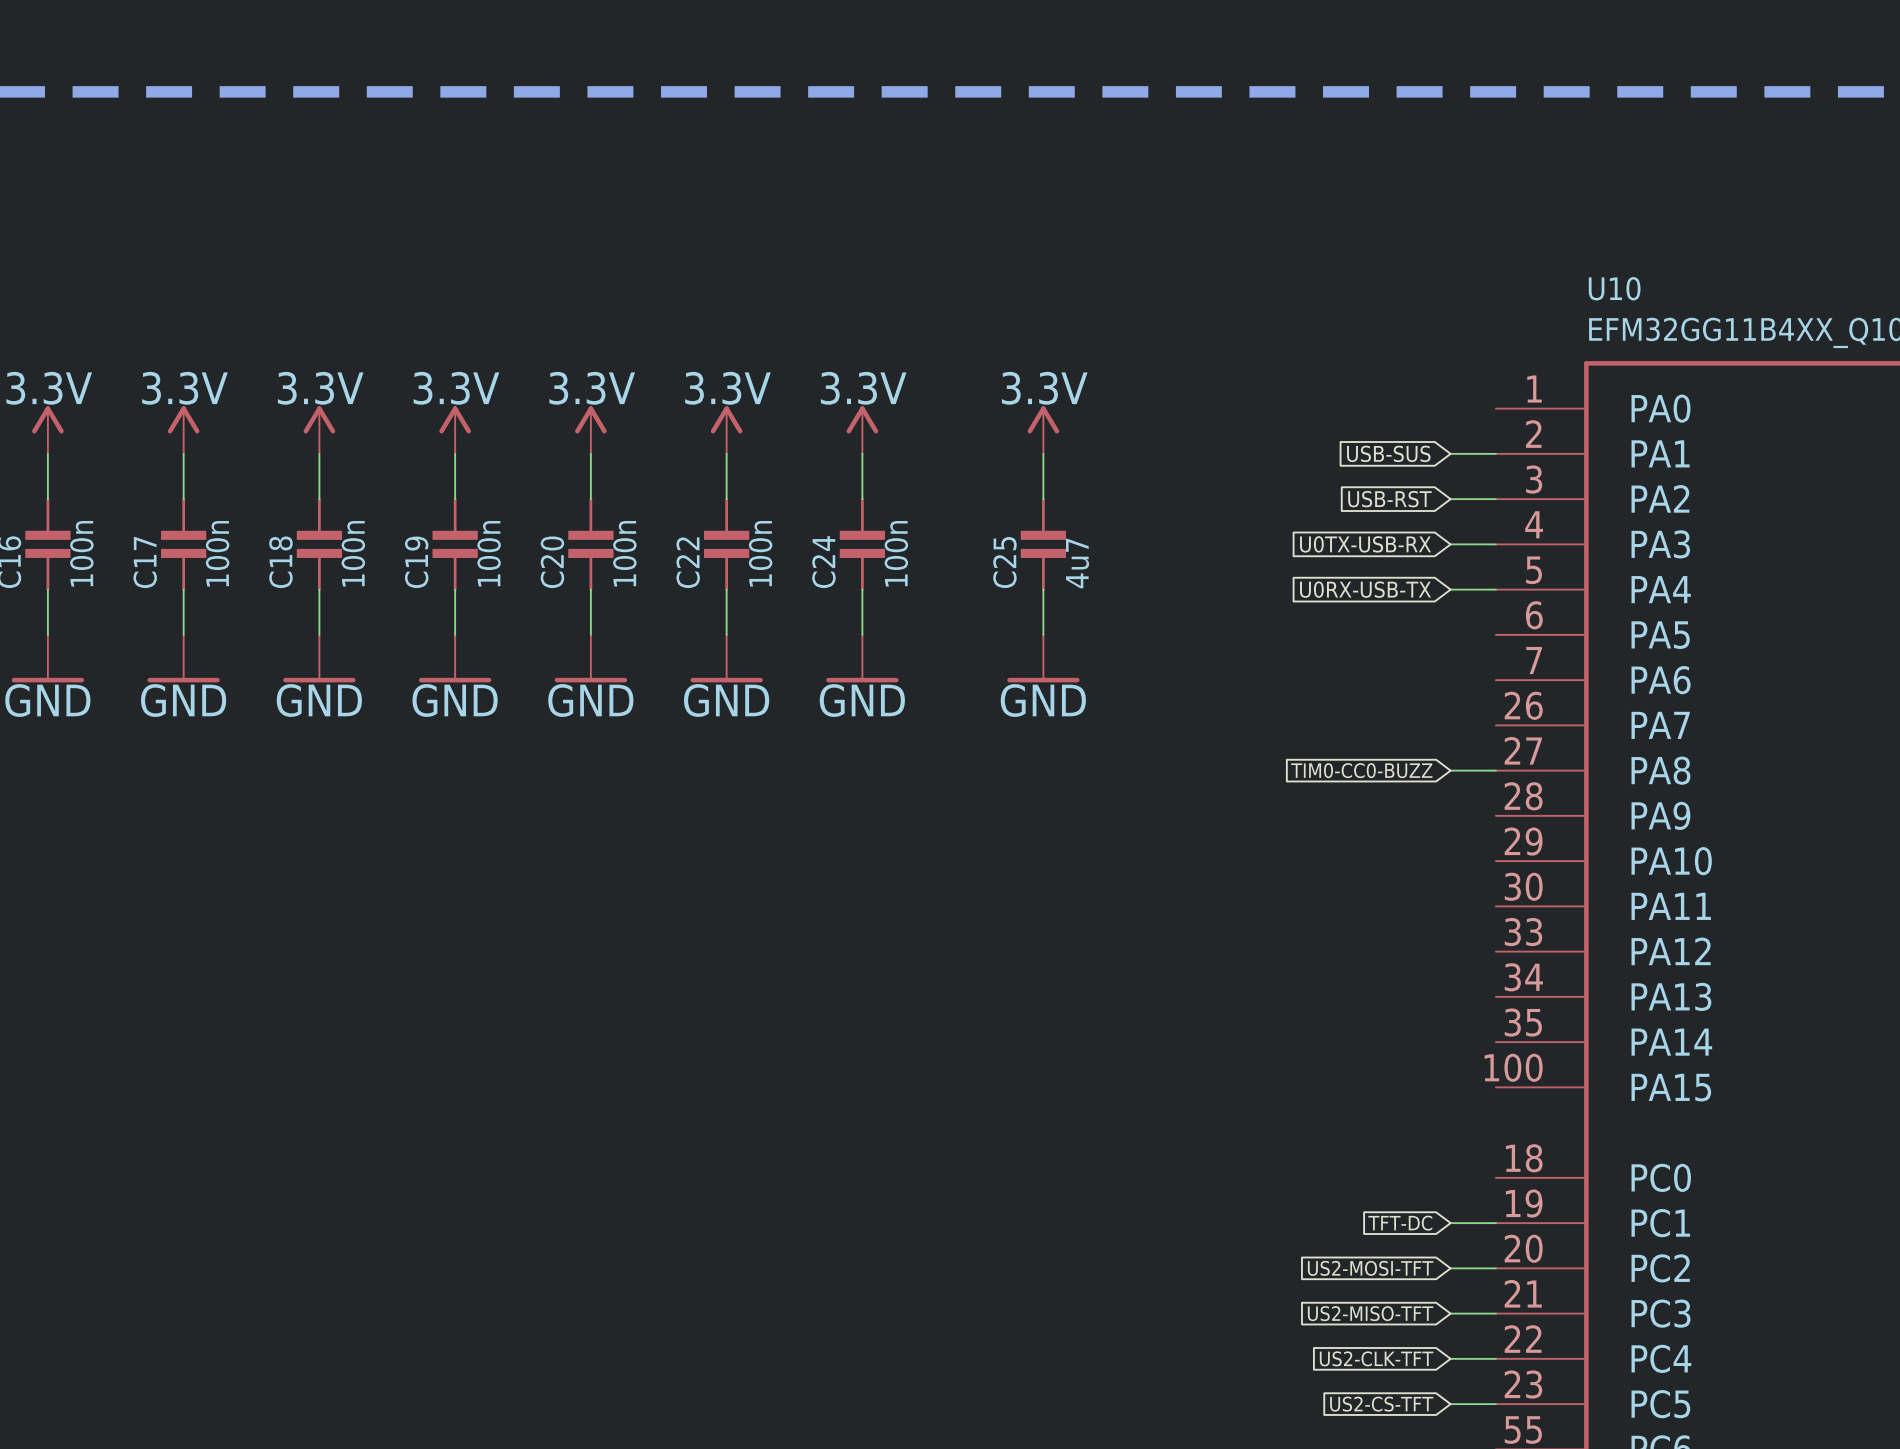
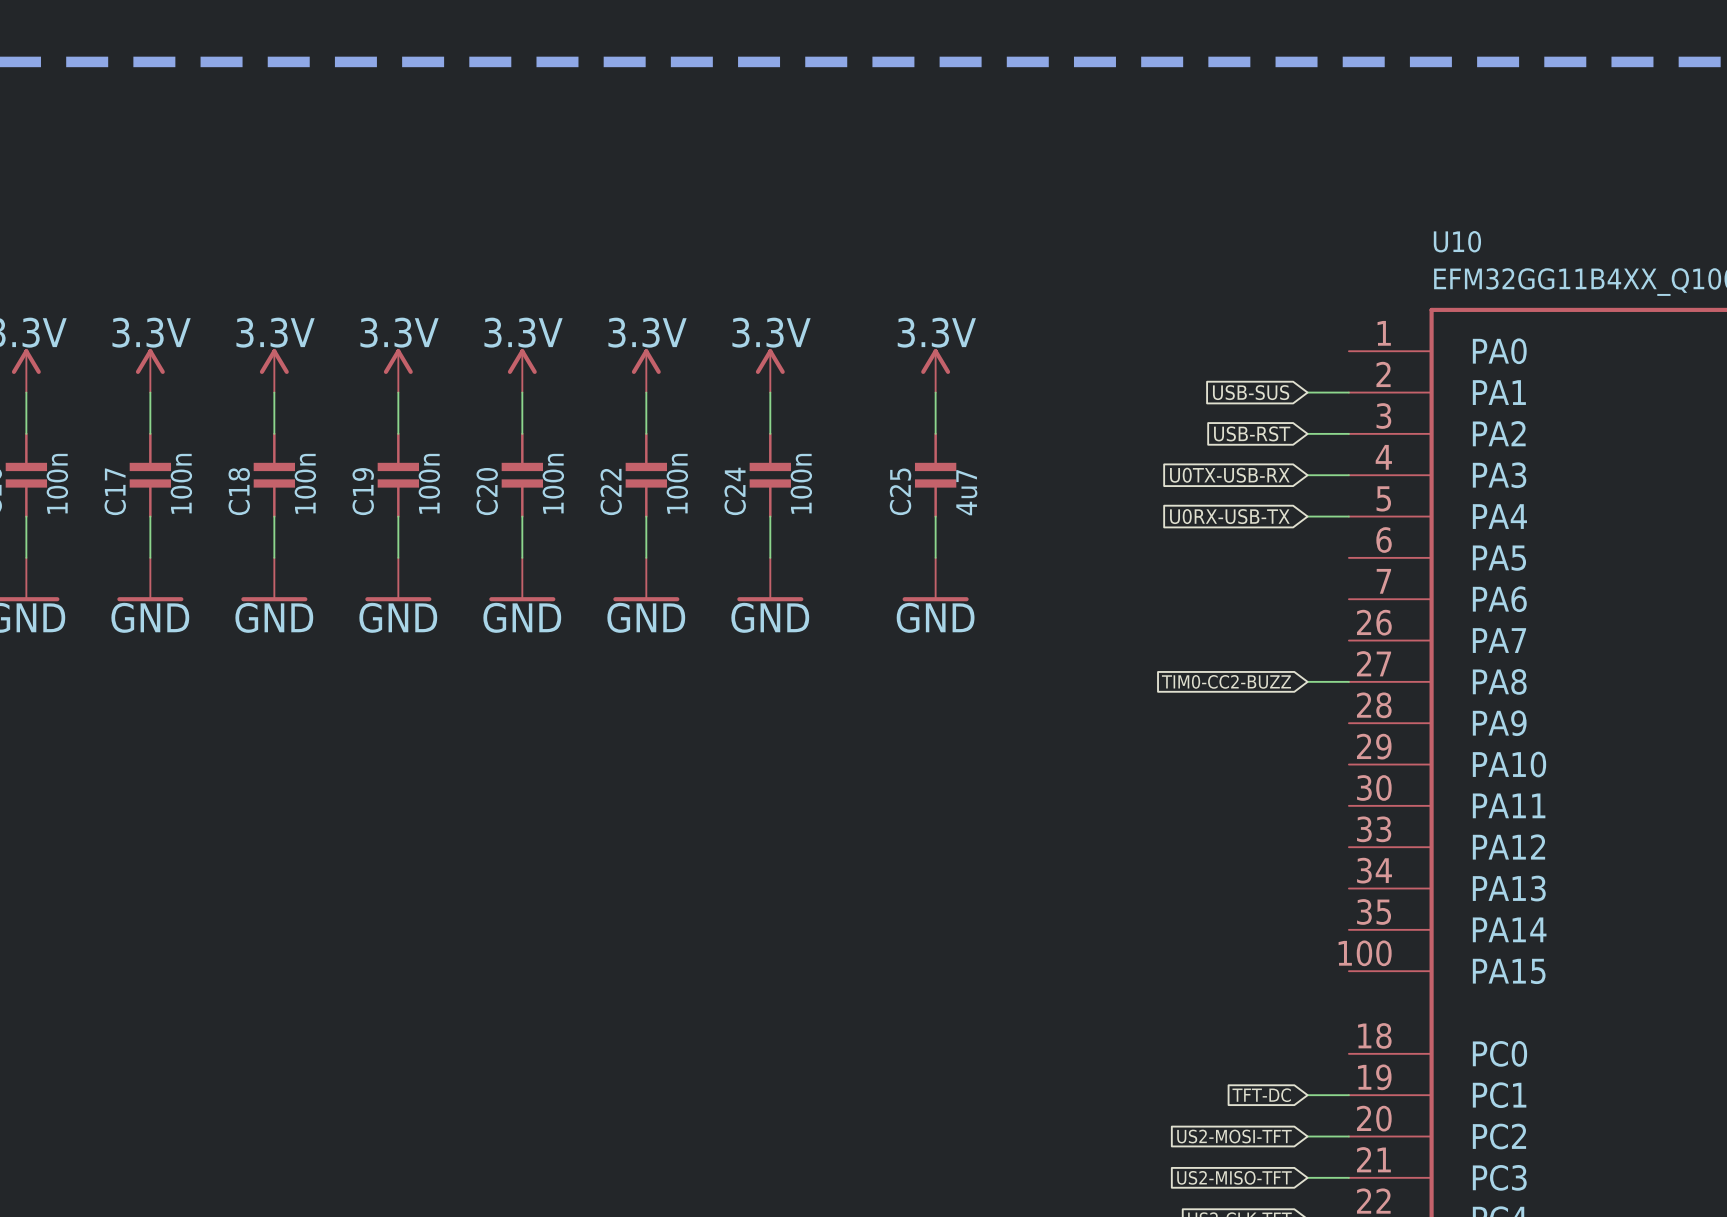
global label: TIM0-CC0-BUZZ (1361, 770) -> TIM0-CC2-BUZZ (1226, 681)

